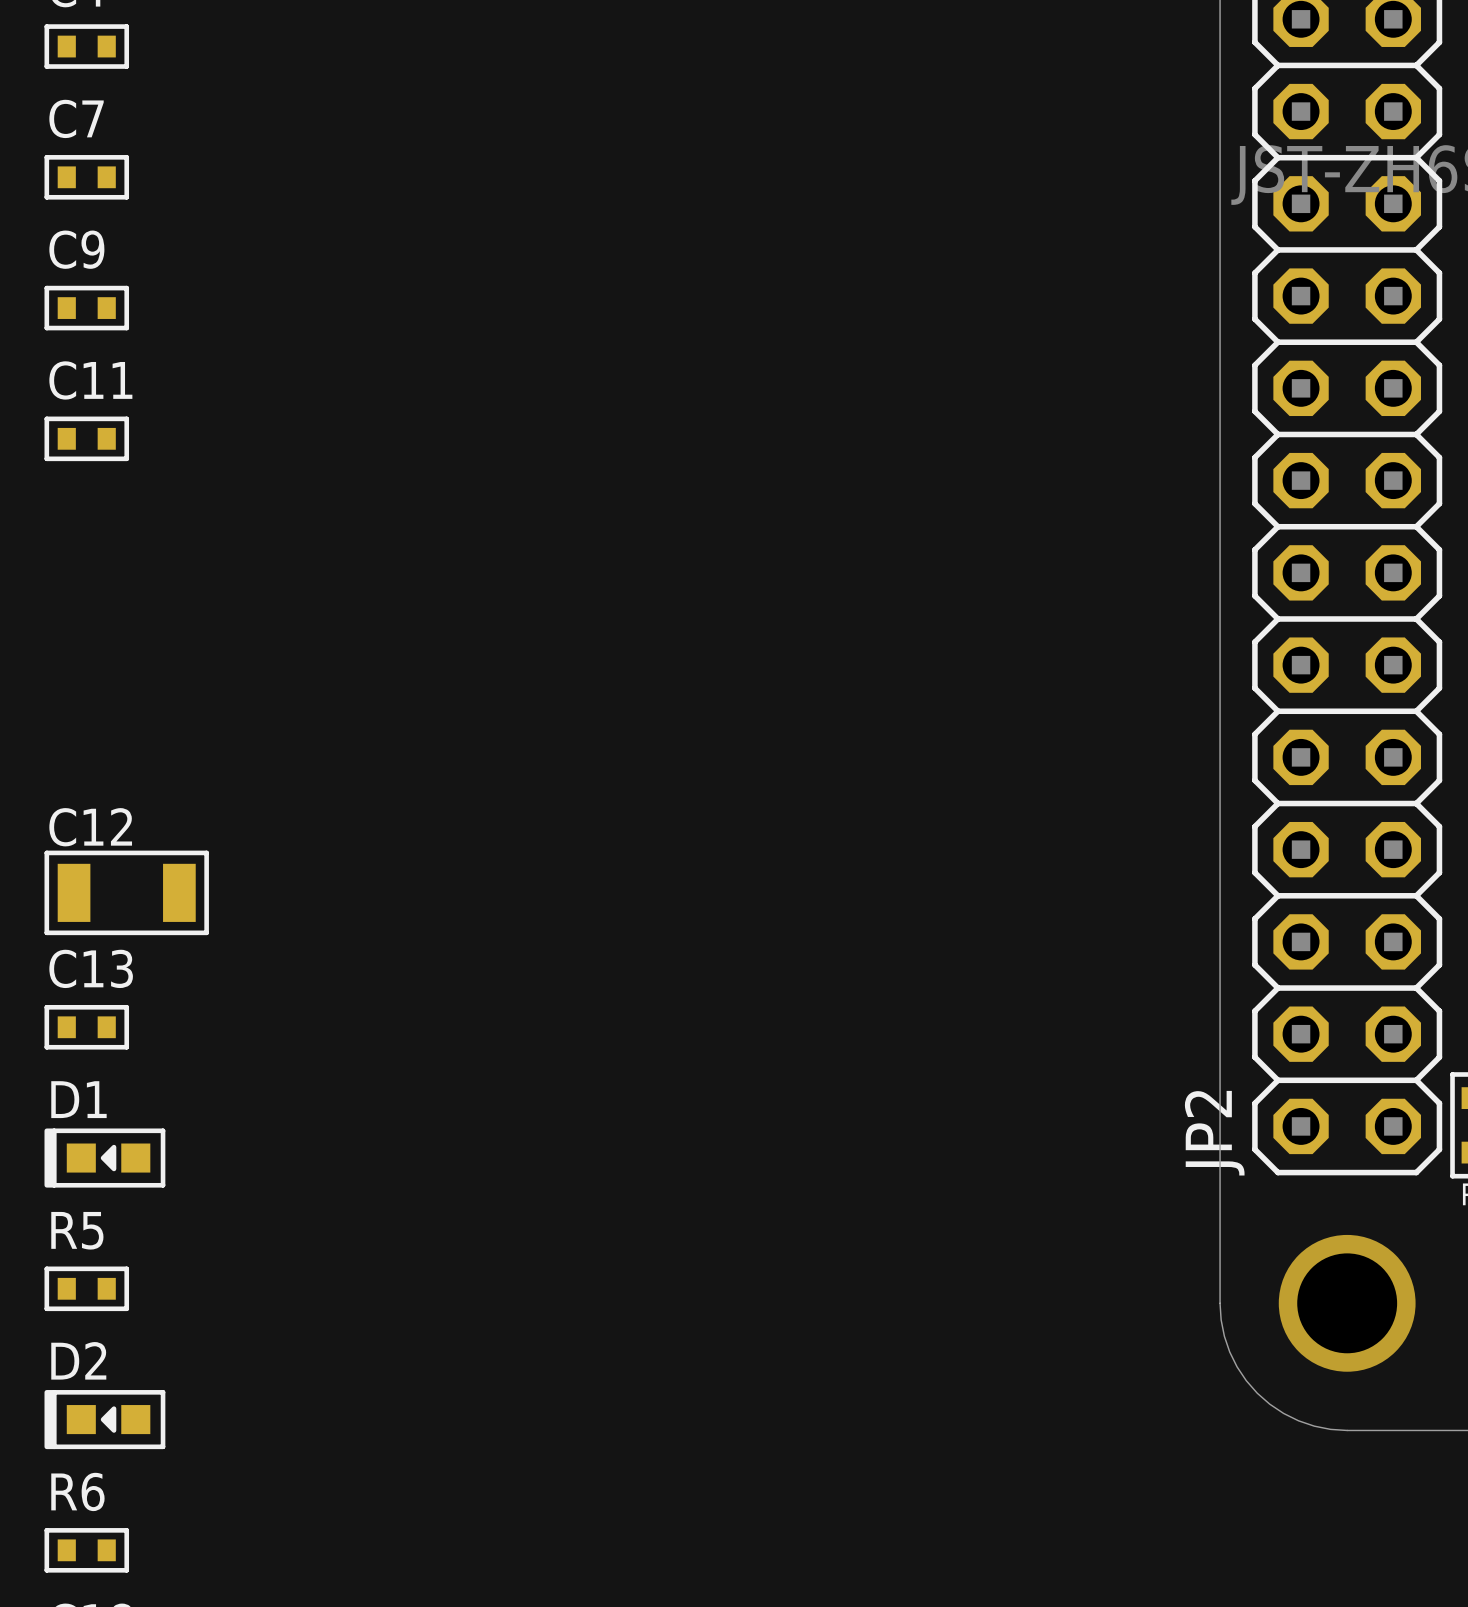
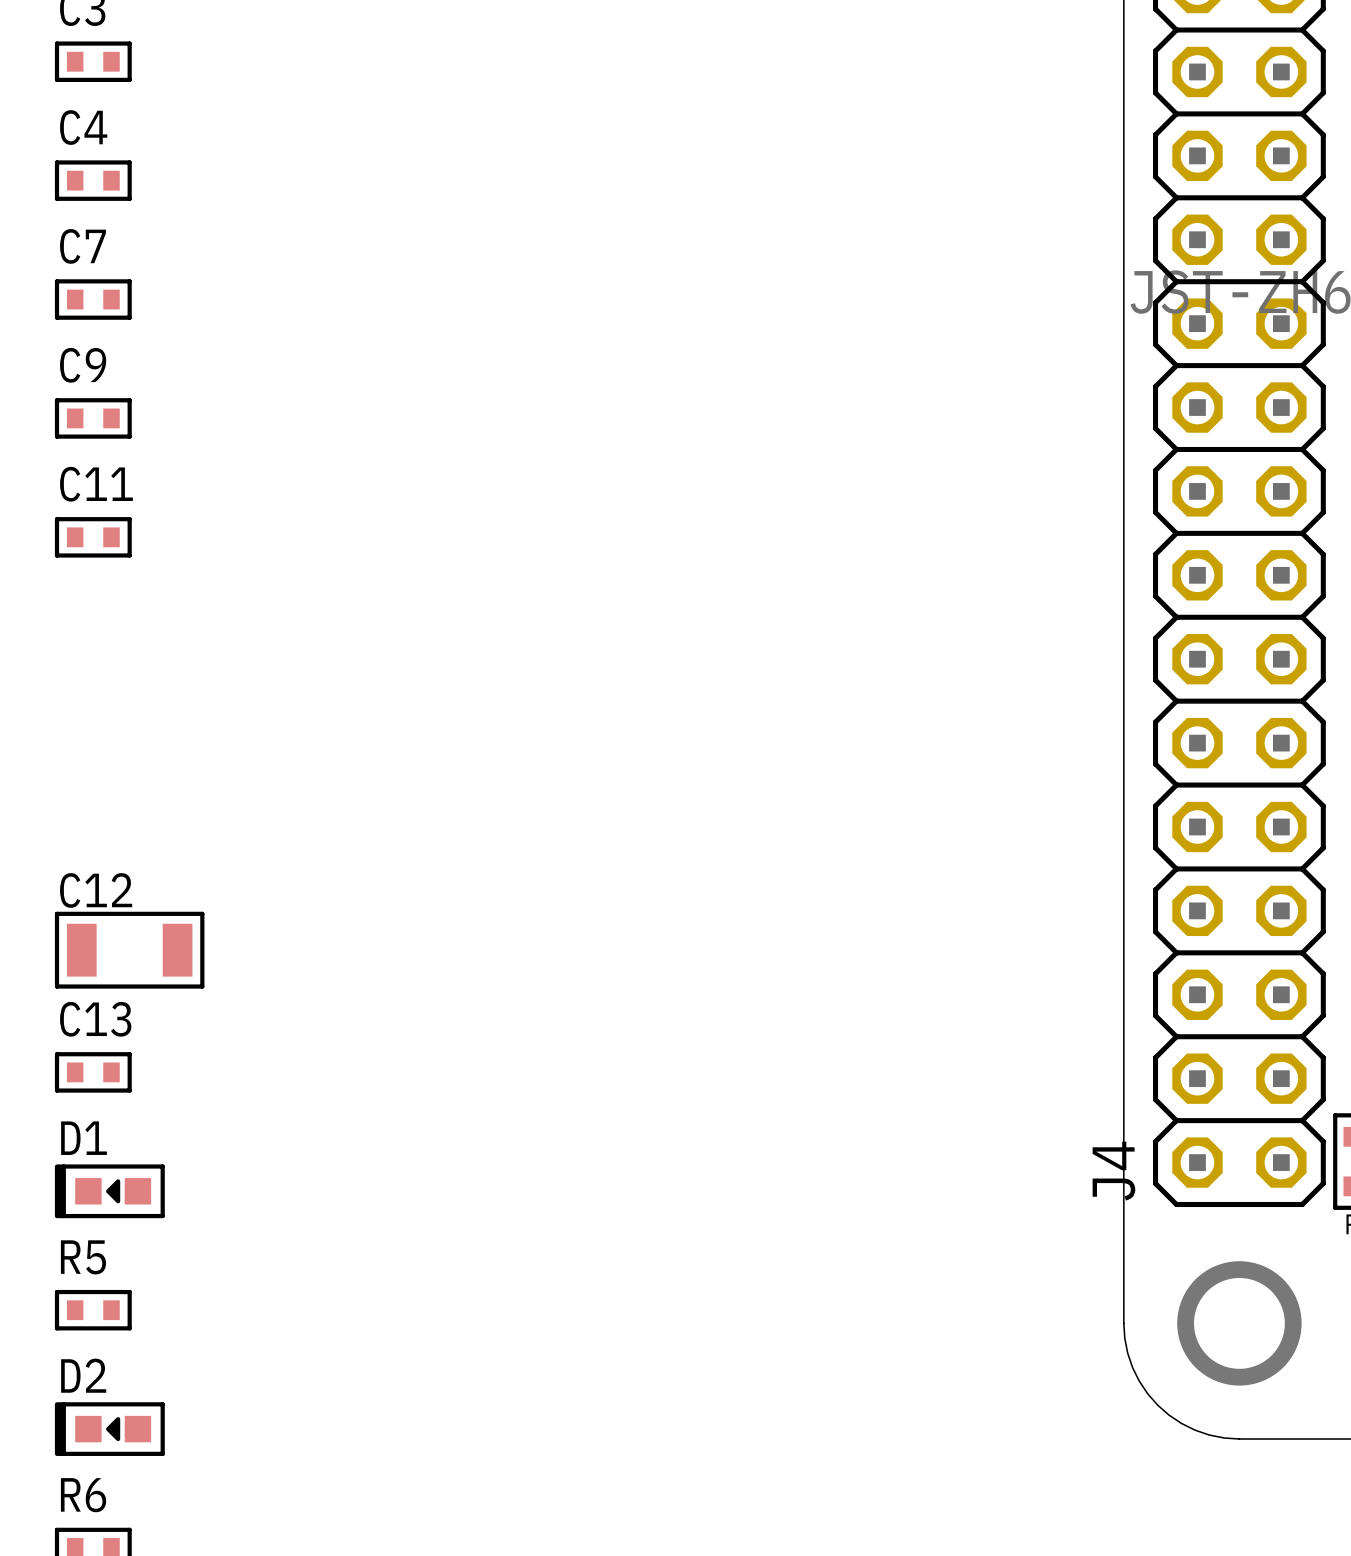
JP2 name: JP2 (1214, 1133) -> J4 (1113, 1171)

